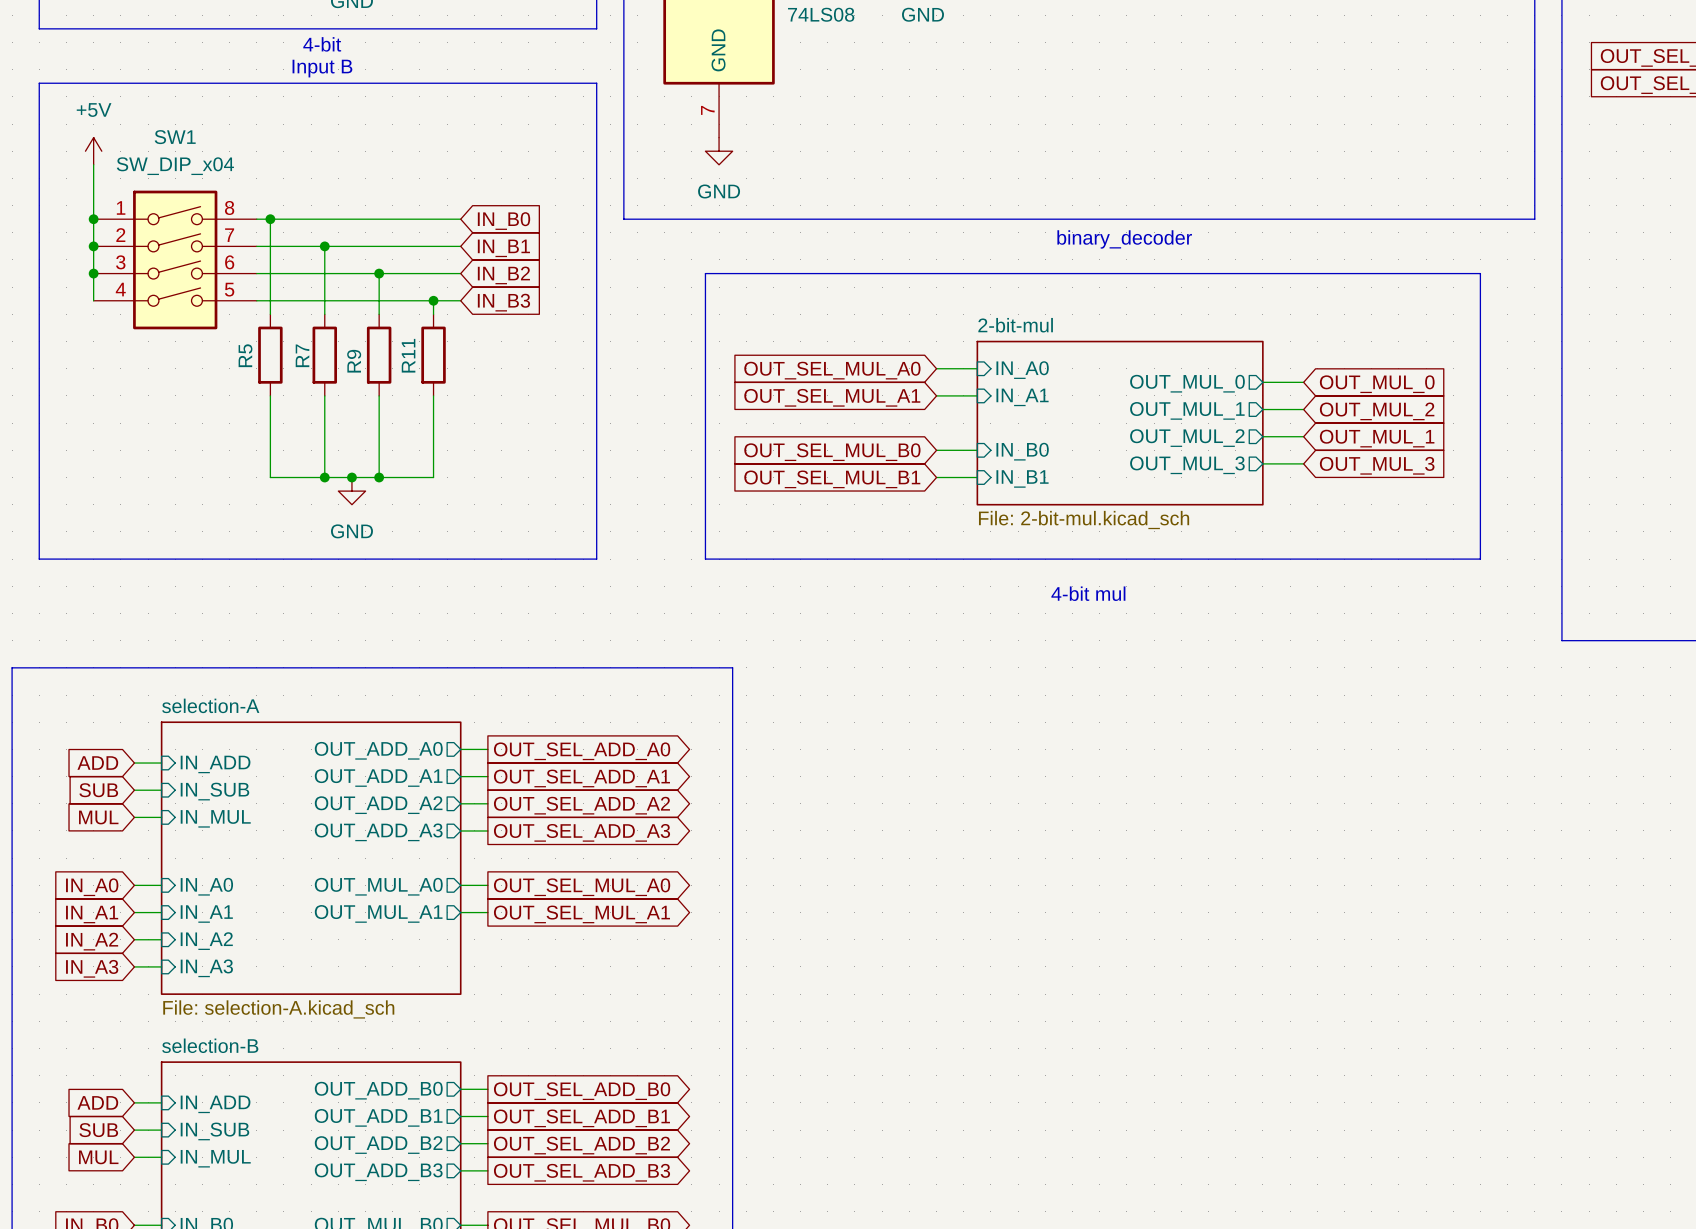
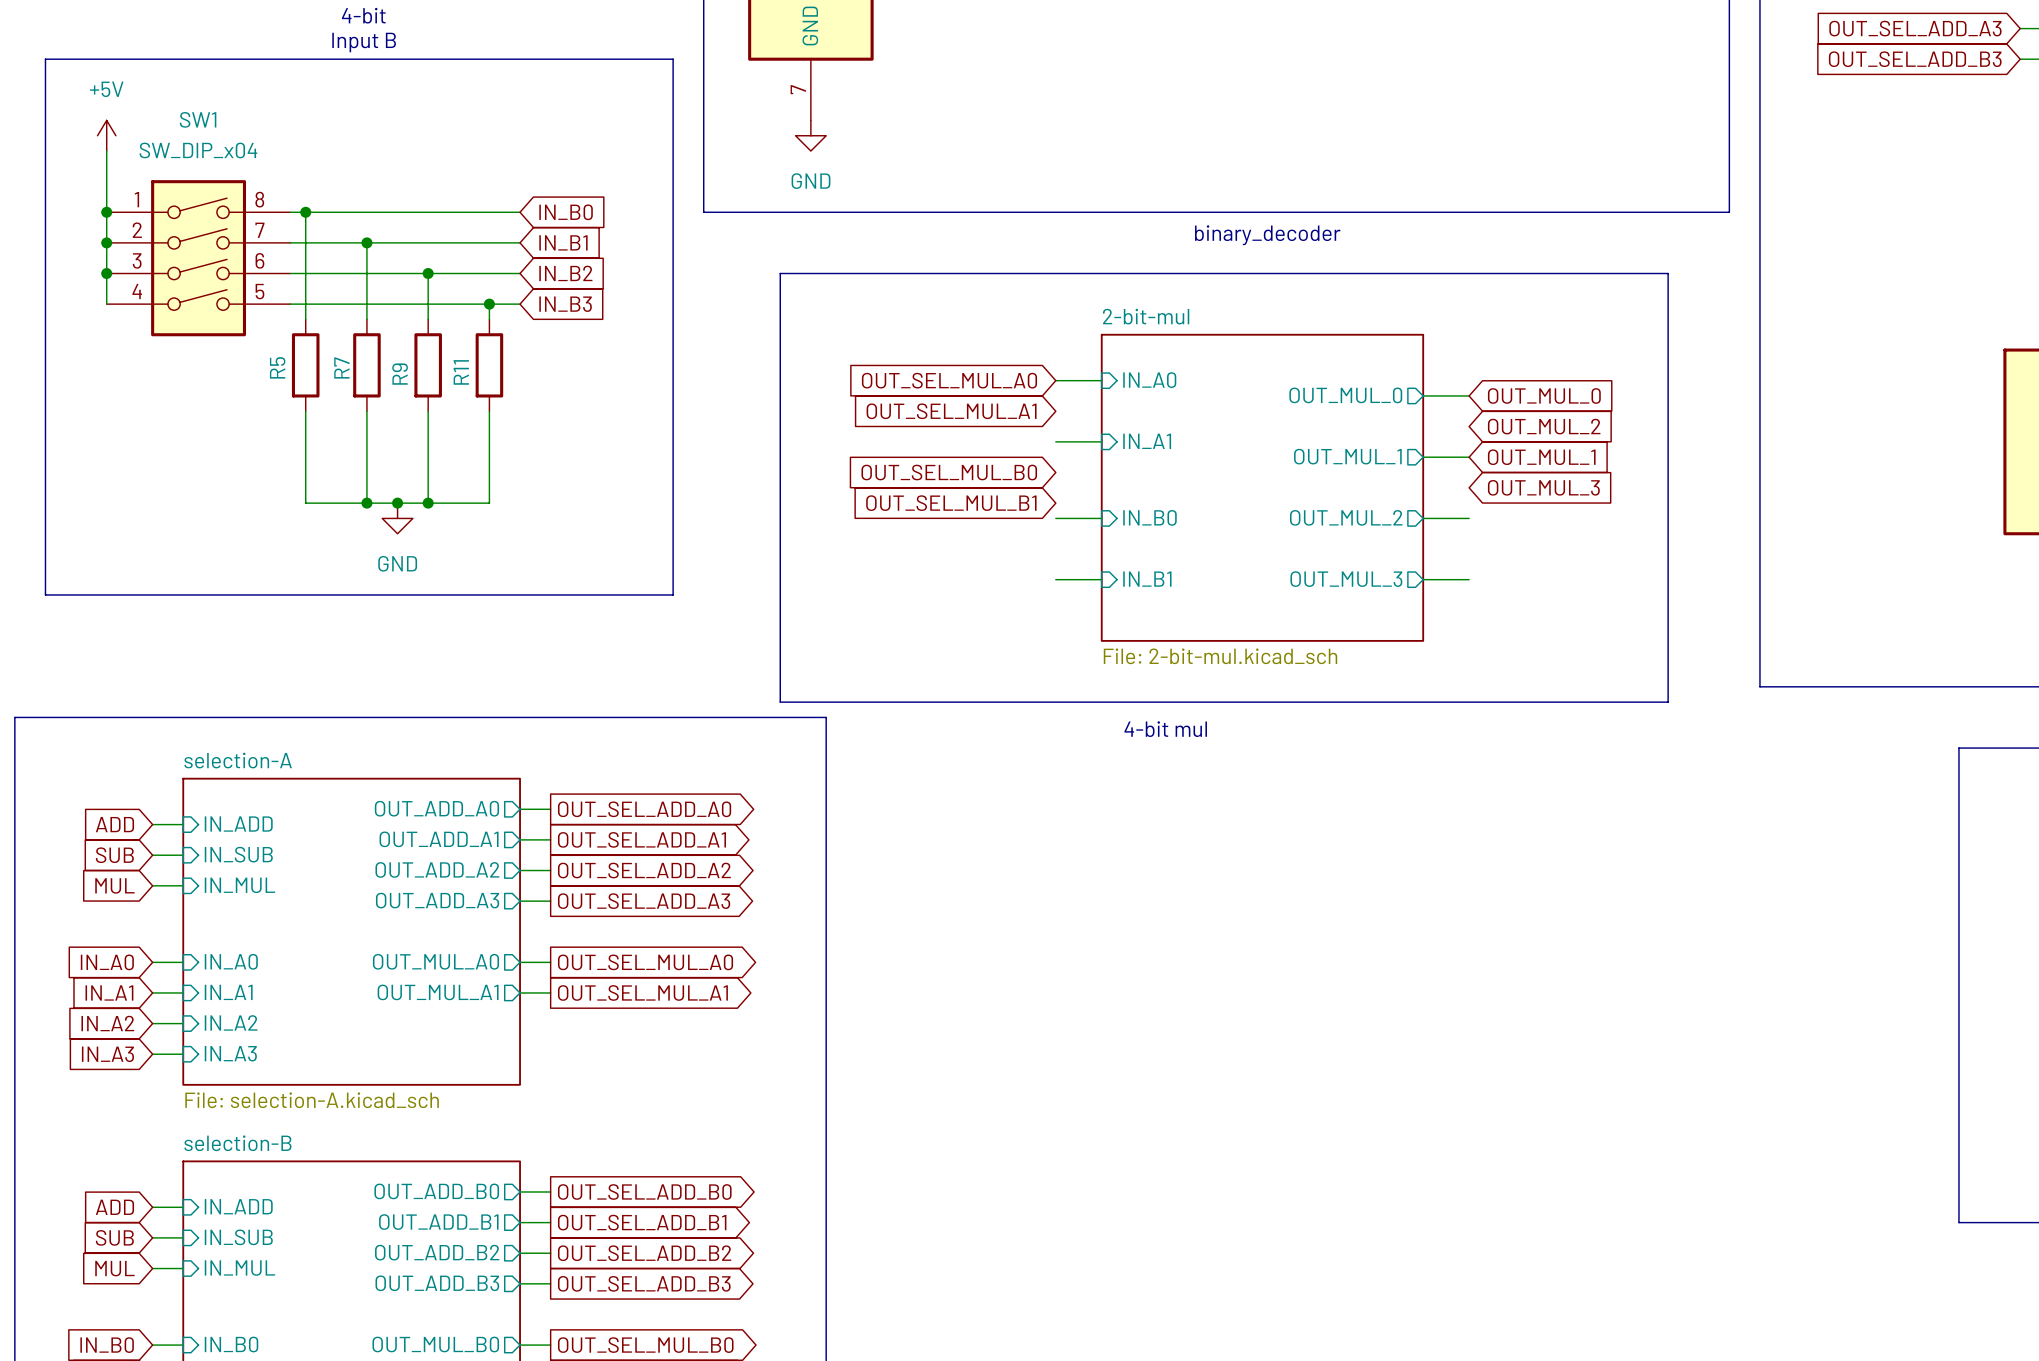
line: (705, 273) (705, 559) (1480, 559) -> (795, 273) (780, 273) (780, 702) (1668, 702) (1668, 594)
sheet 2-bit-mul name position: 2-bit-mul (1015, 325) -> 2-bit-mul (1146, 316)
sheet 2-bit-mul shape: [976, 340, 1264, 506] -> [1100, 333, 1425, 642]
wire: (936, 395) (977, 395) -> (1055, 441) (1101, 441)
sheet pin position: IN_A1 (1022, 397) -> IN_A1 (1147, 441)
wire: (1262, 409) (1303, 409) -> (1423, 579) (1469, 579)
sheet pin: OUT_MUL_1 (1187, 410) -> none
sheet pin: OUT_MUL_2 (1187, 438) -> OUT_MUL_1 (1347, 456)
wire: (936, 450) (977, 450) -> (1055, 579) (1101, 579)
sheet pin position: IN_B0 (1022, 451) -> IN_B0 (1149, 517)
wire: (1262, 463) (1303, 463) -> (1423, 518) (1469, 518)
sheet pin position: OUT_MUL_3 (1187, 465) -> OUT_MUL_3 (1346, 579)
wire: (936, 477) (977, 477) -> (1055, 518) (1101, 518)
sheet pin position: IN_B1 (1022, 478) -> IN_B1 (1147, 579)
sheet pin: none -> OUT_MUL_2 (1346, 517)
sheet 2-bit-mul value position: File: 2-bit-mul.kicad_sch (1084, 520) -> File: 2-bit-mul.kicad_sch (1220, 656)
text position: 4-bit mul (1088, 593) -> 4-bit mul (1165, 729)

